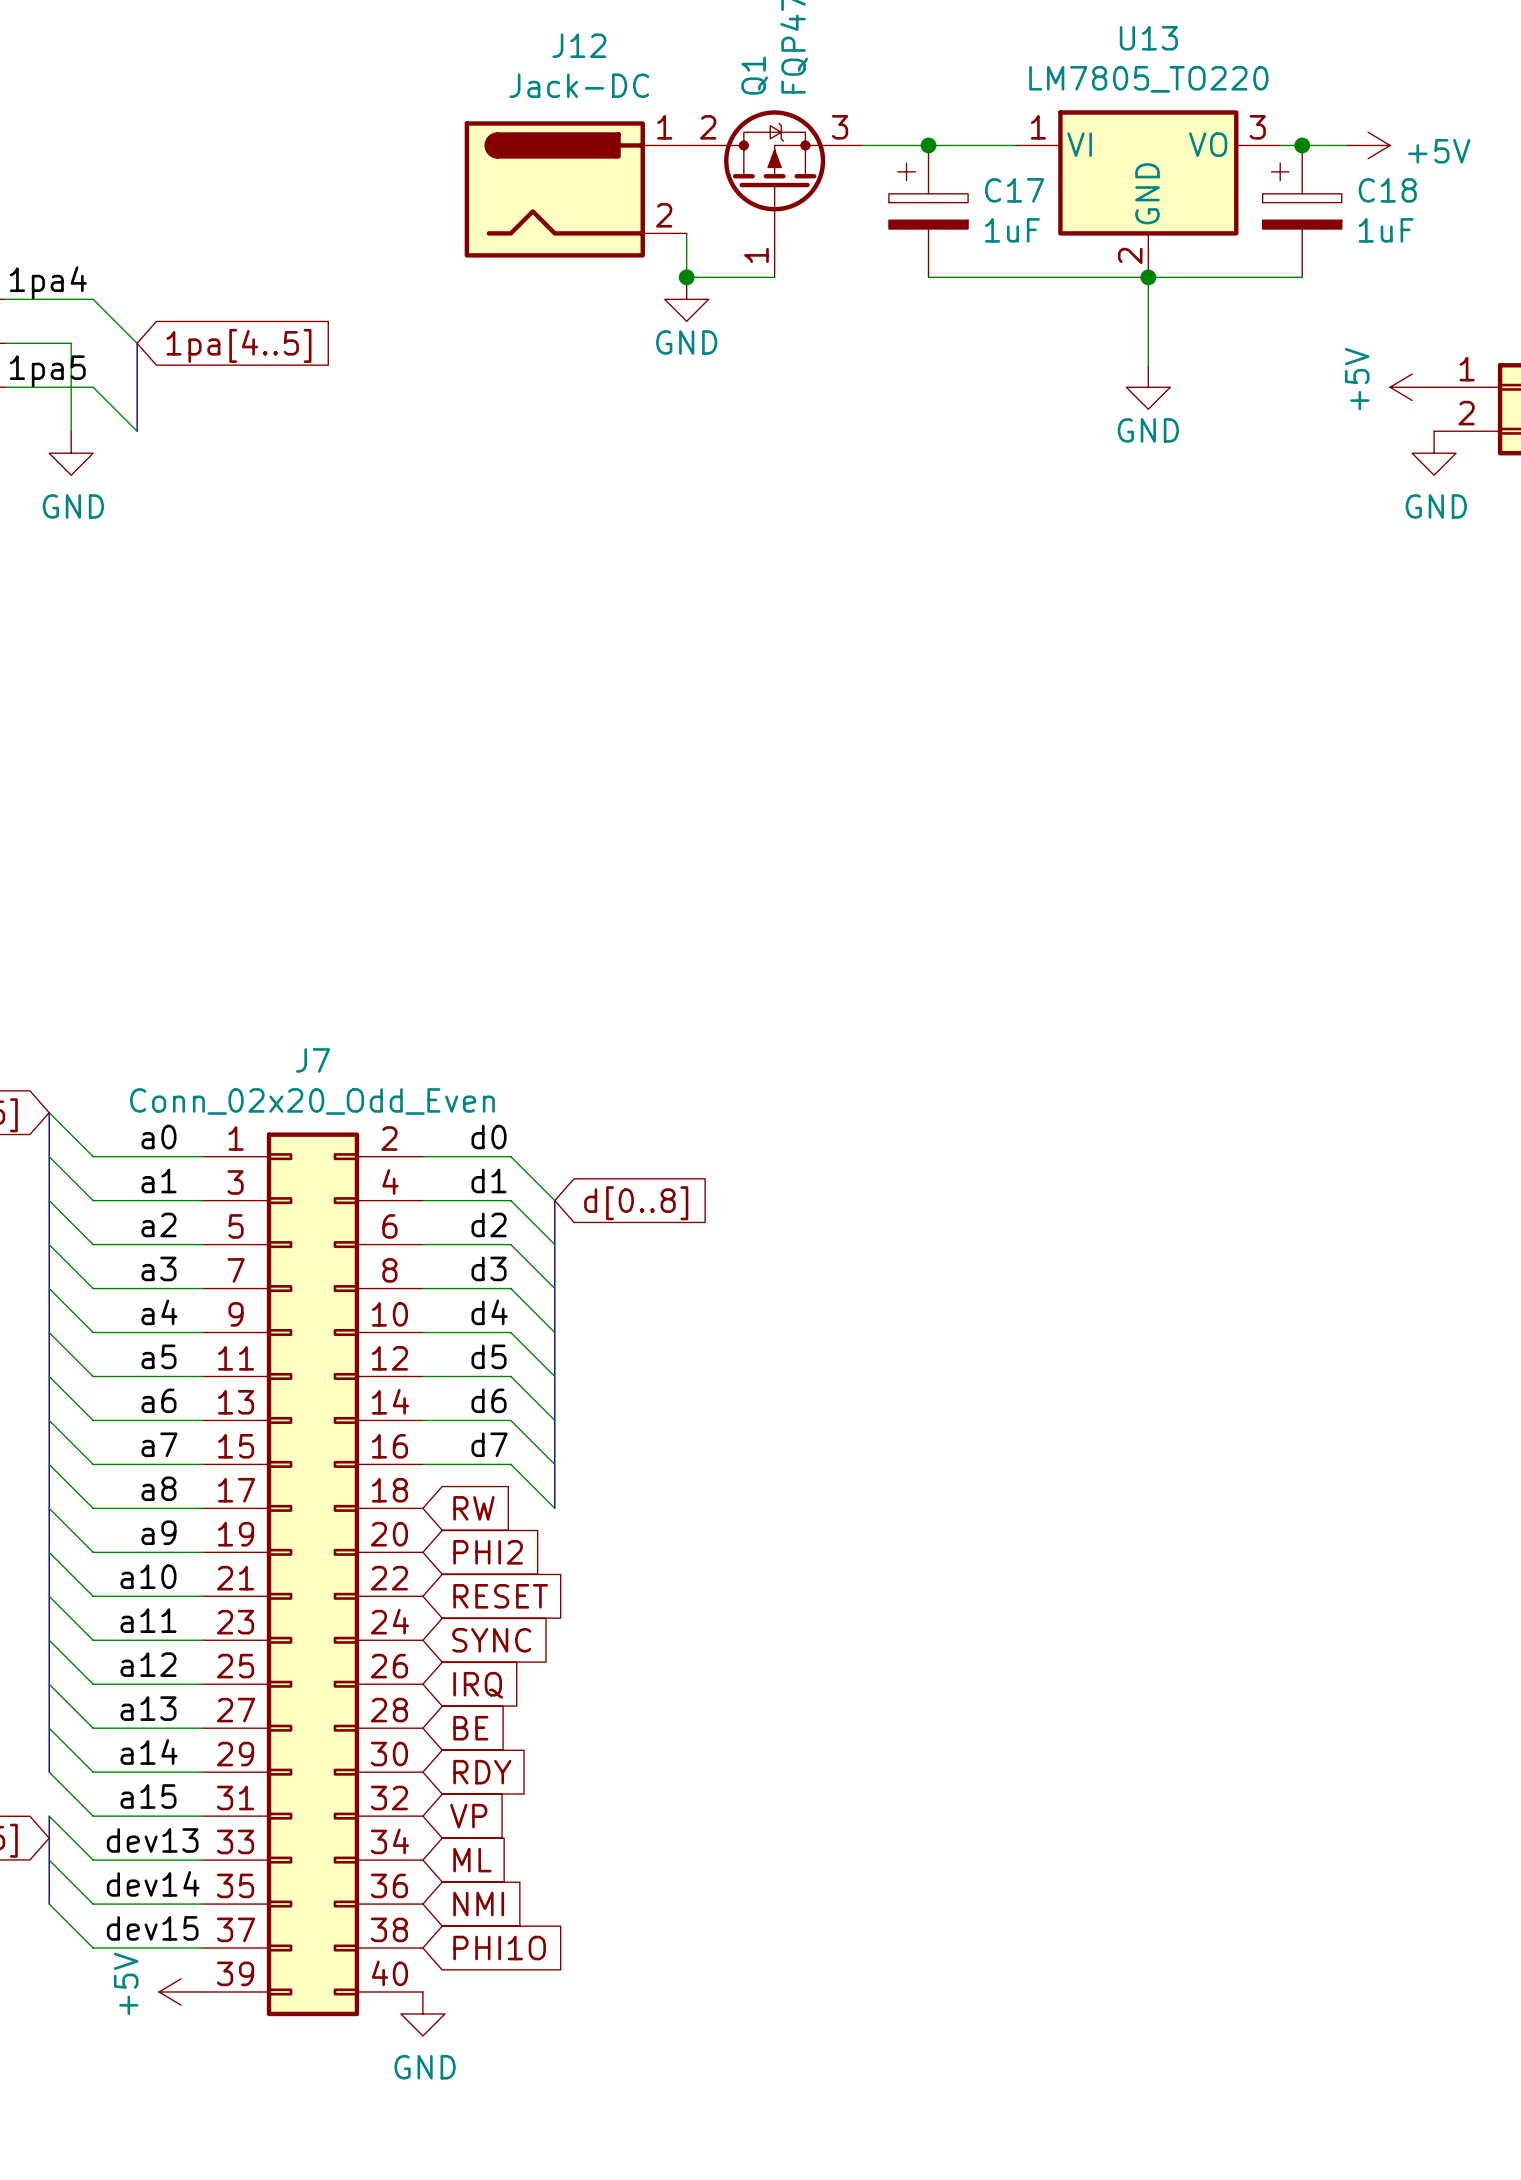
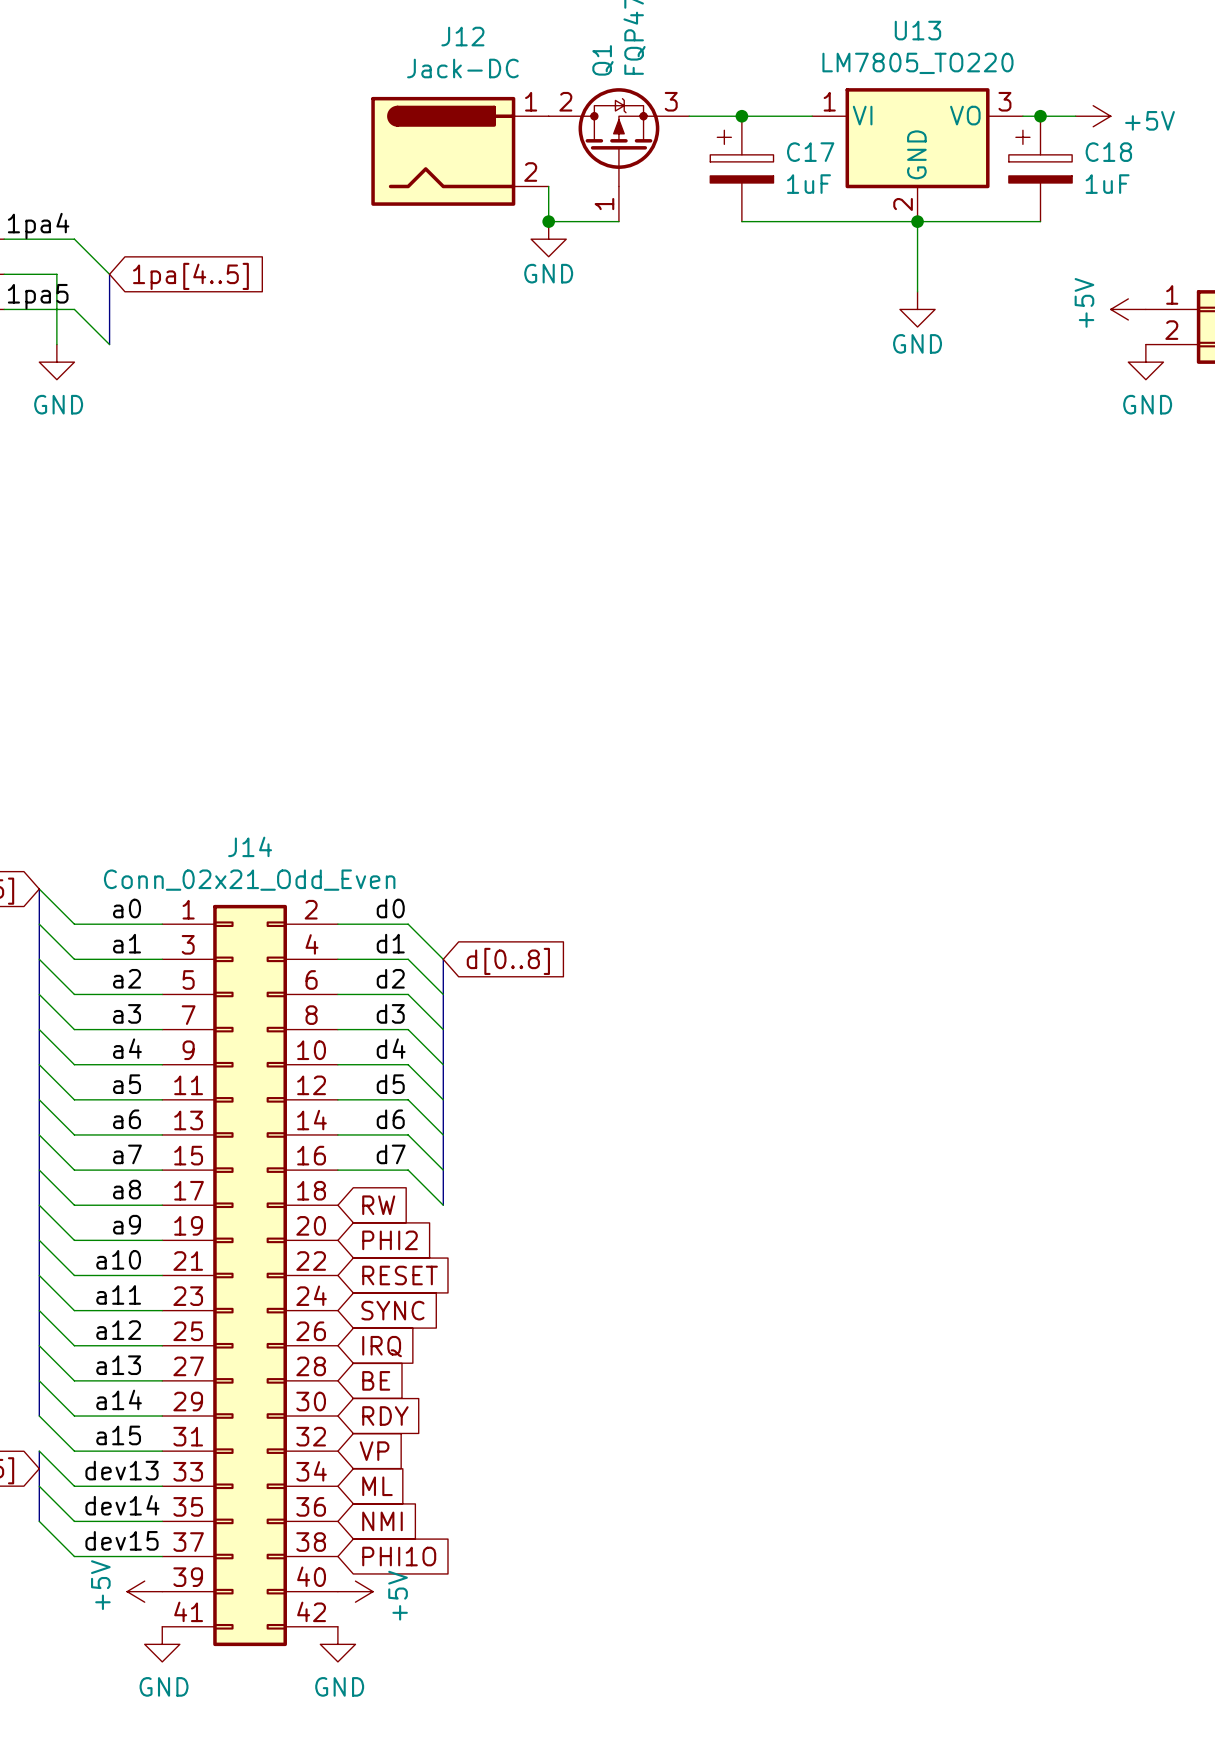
J7: Conn_02x20_Odd_Even (313, 1574) -> none
J14: none -> Conn_02x21_Odd_Even (250, 1275)
power symbol: none -> +5V (355, 1591)
power symbol position: GND (422, 2013) -> GND (337, 1644)
power symbol: none -> GND (162, 1644)

